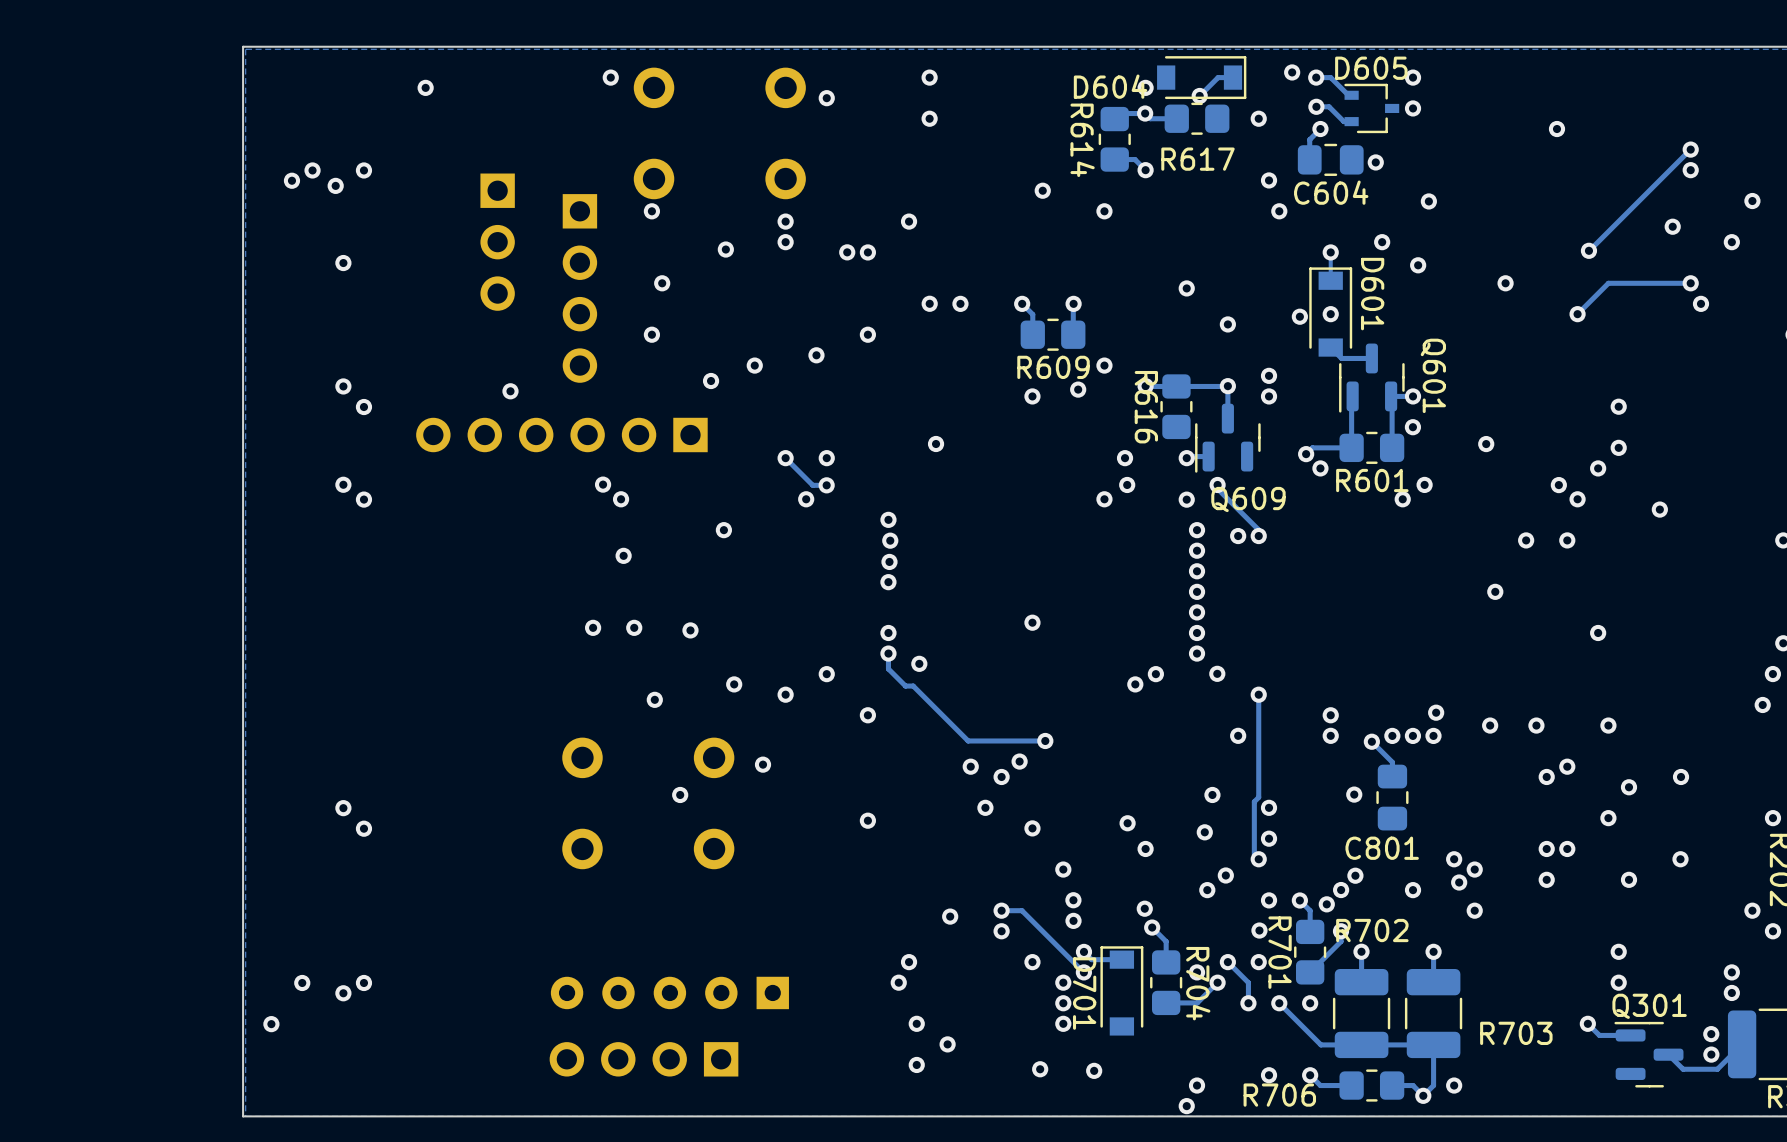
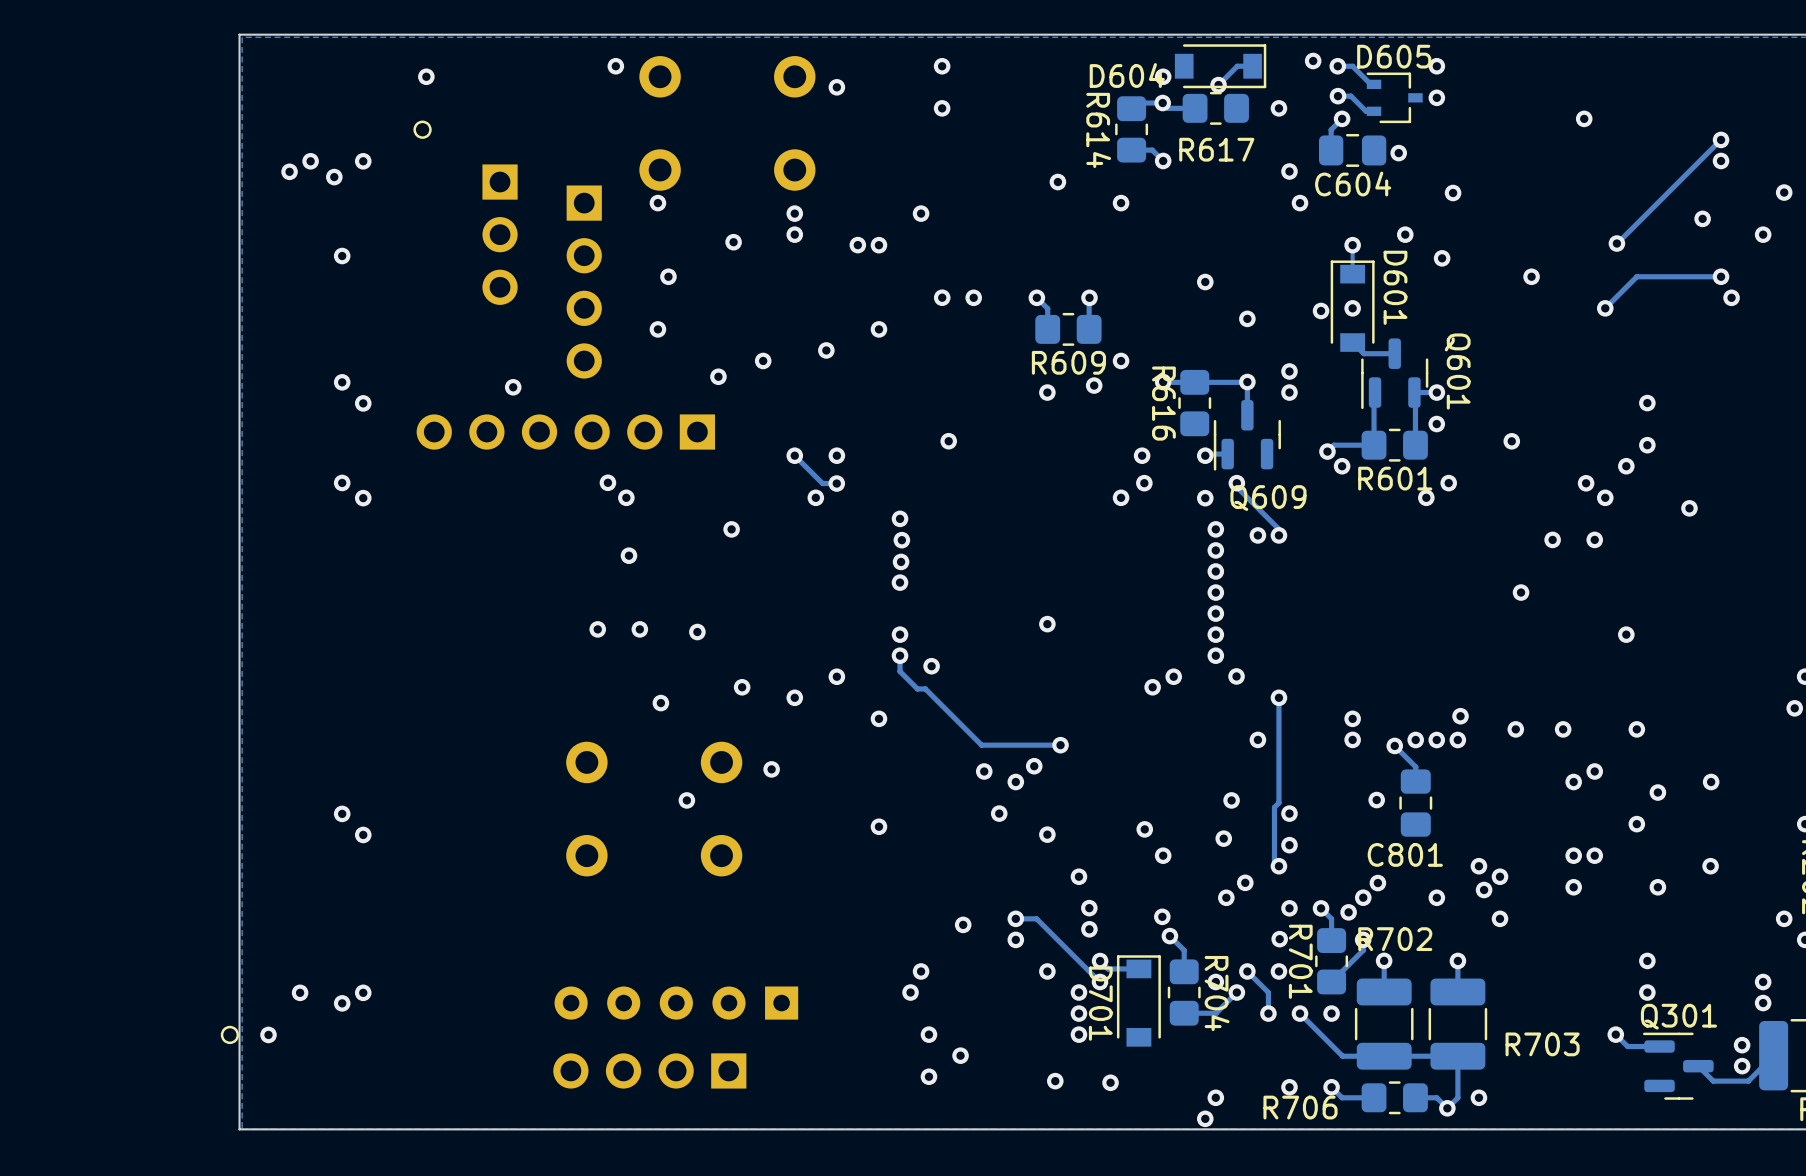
part: none -> (422, 129)
part: none -> (229, 1034)

